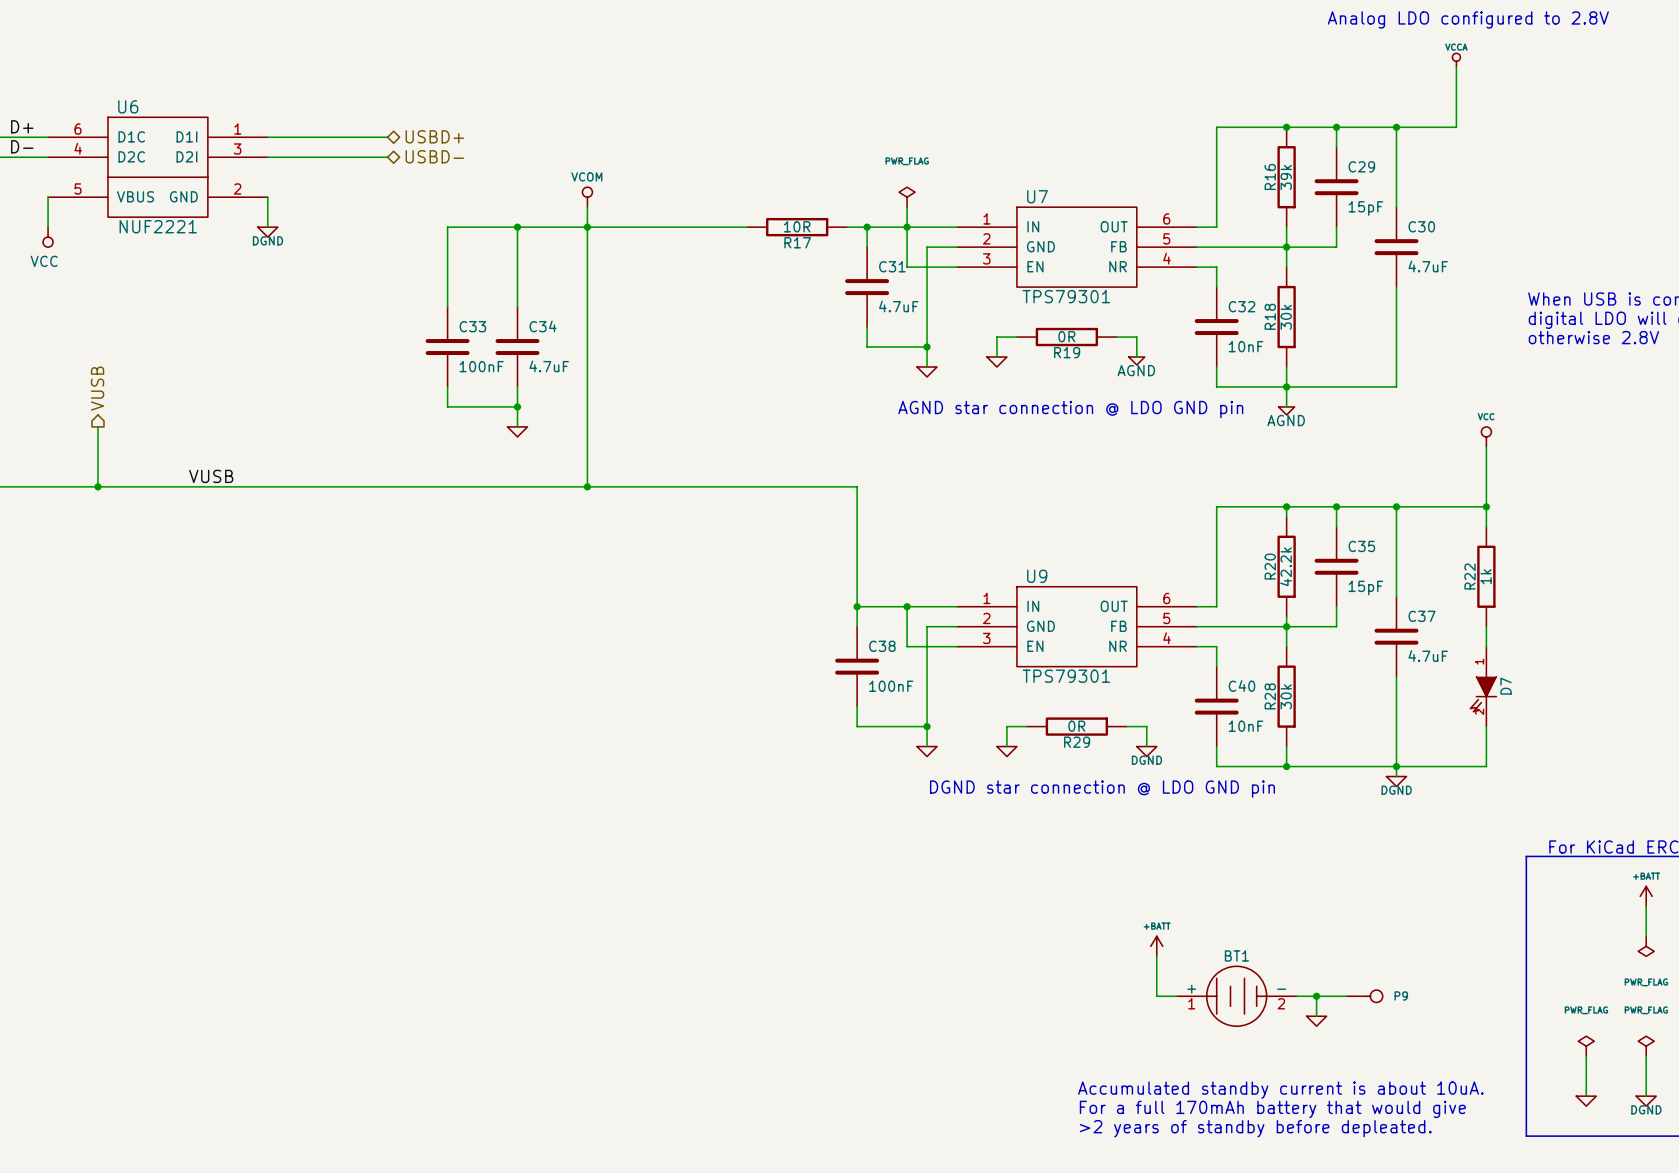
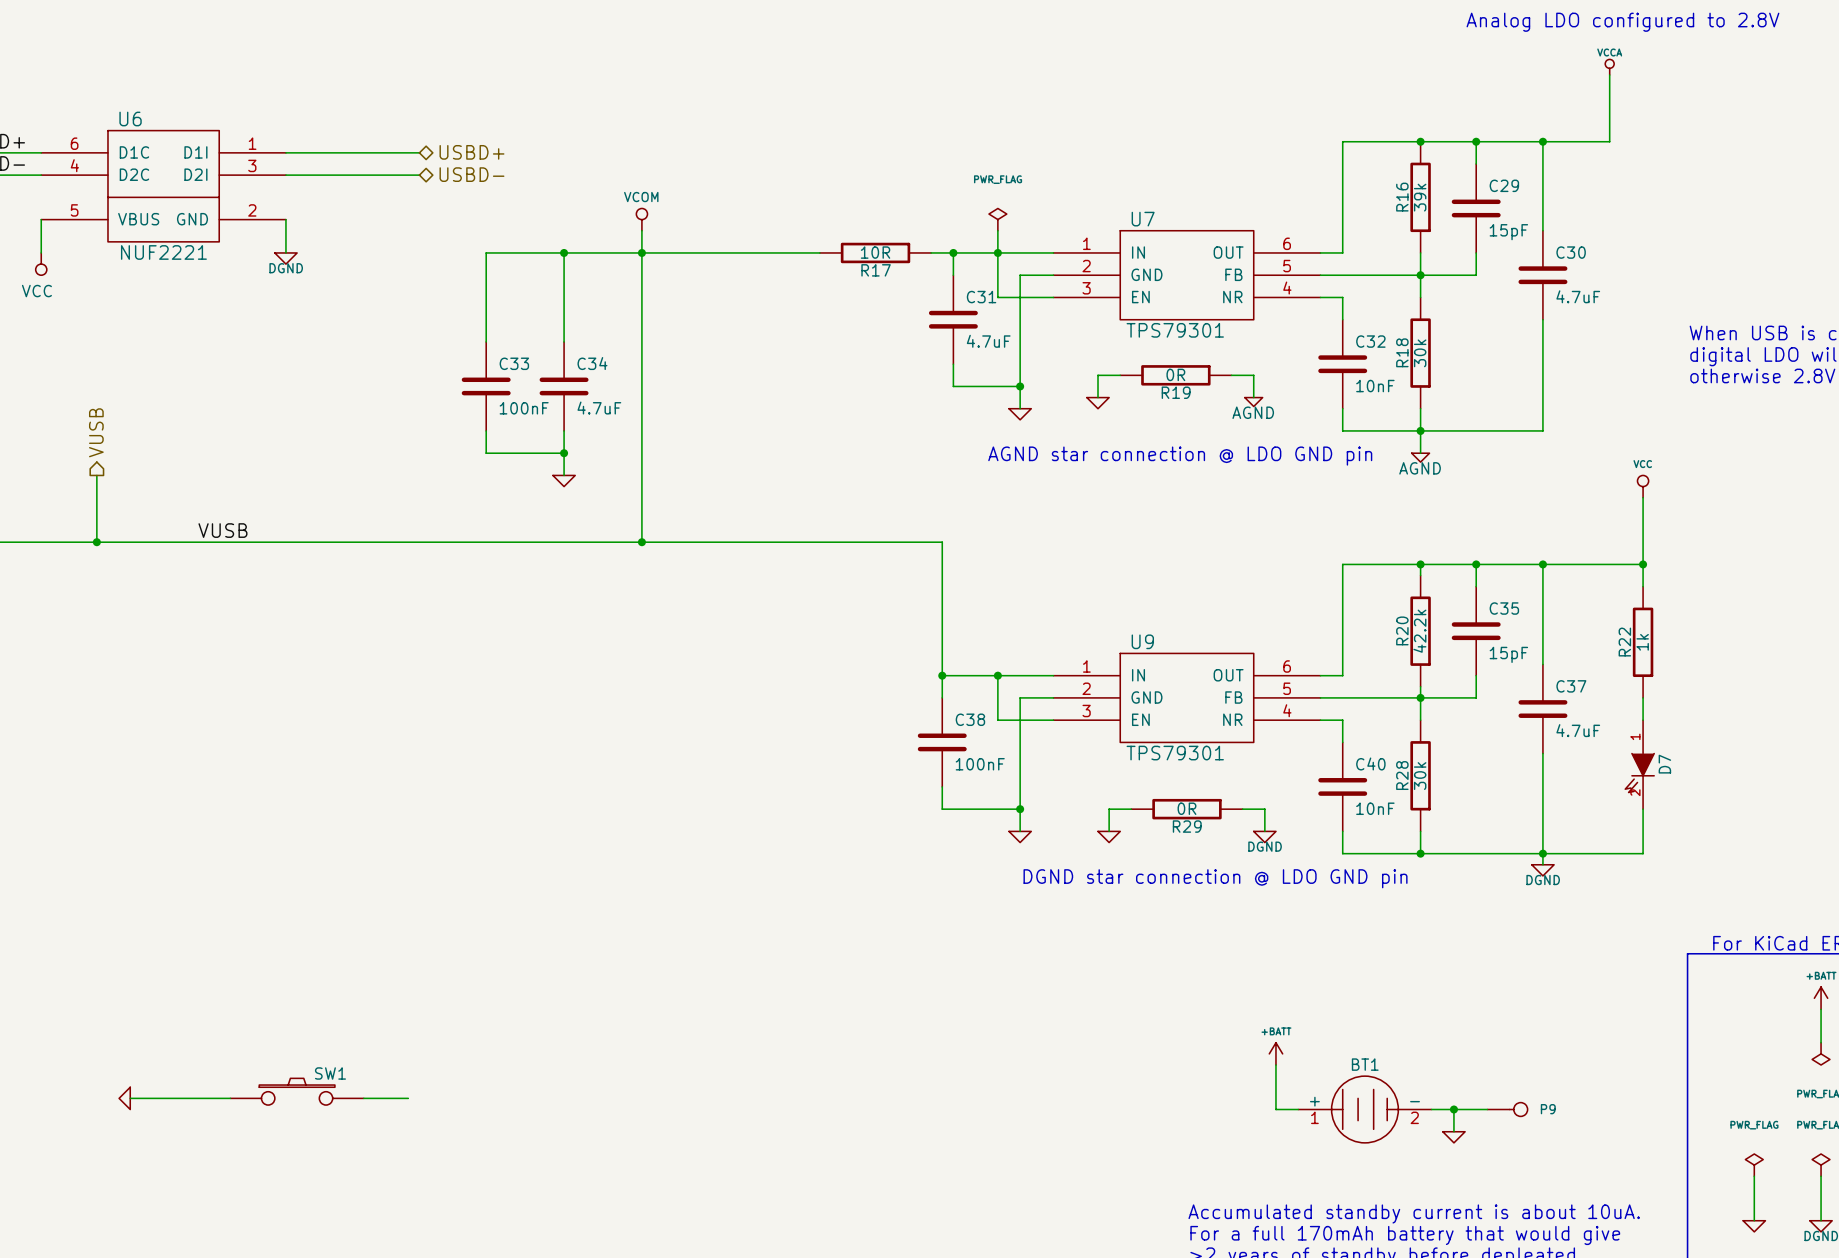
SW1: none -> (297, 1091)
power symbol: none -> (124, 1098)
wire: none -> (130, 1098) (230, 1098)
wire: none -> (363, 1098) (408, 1098)

